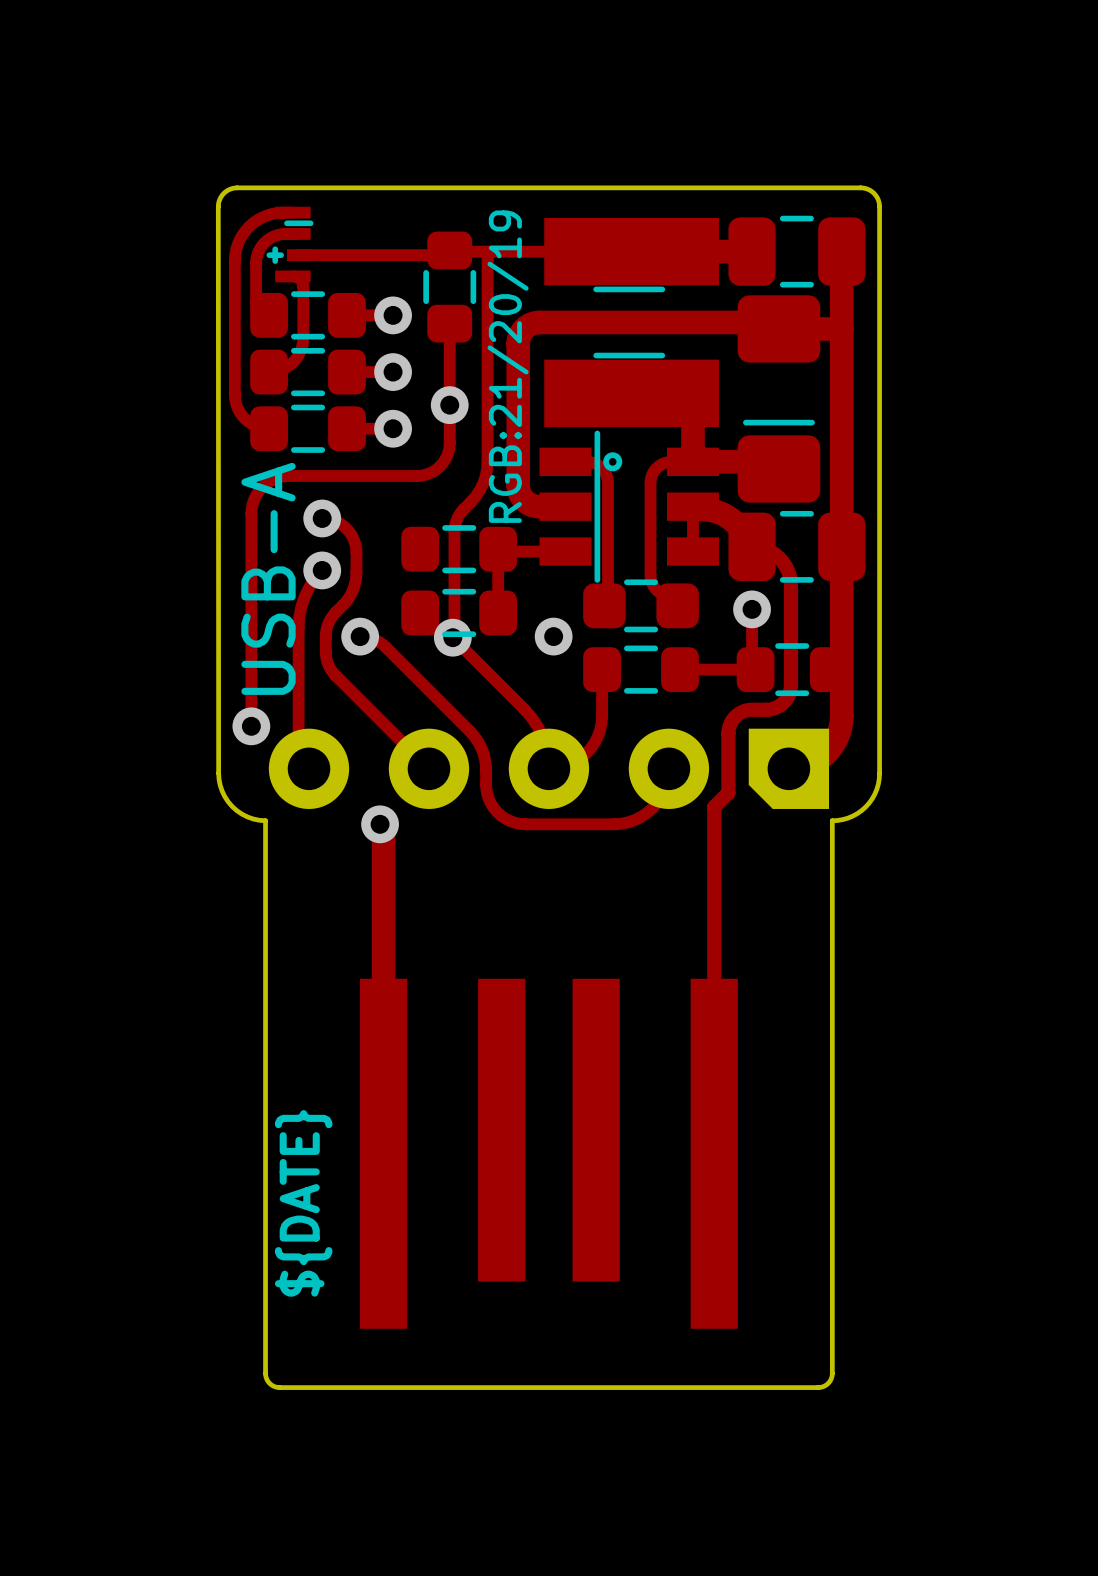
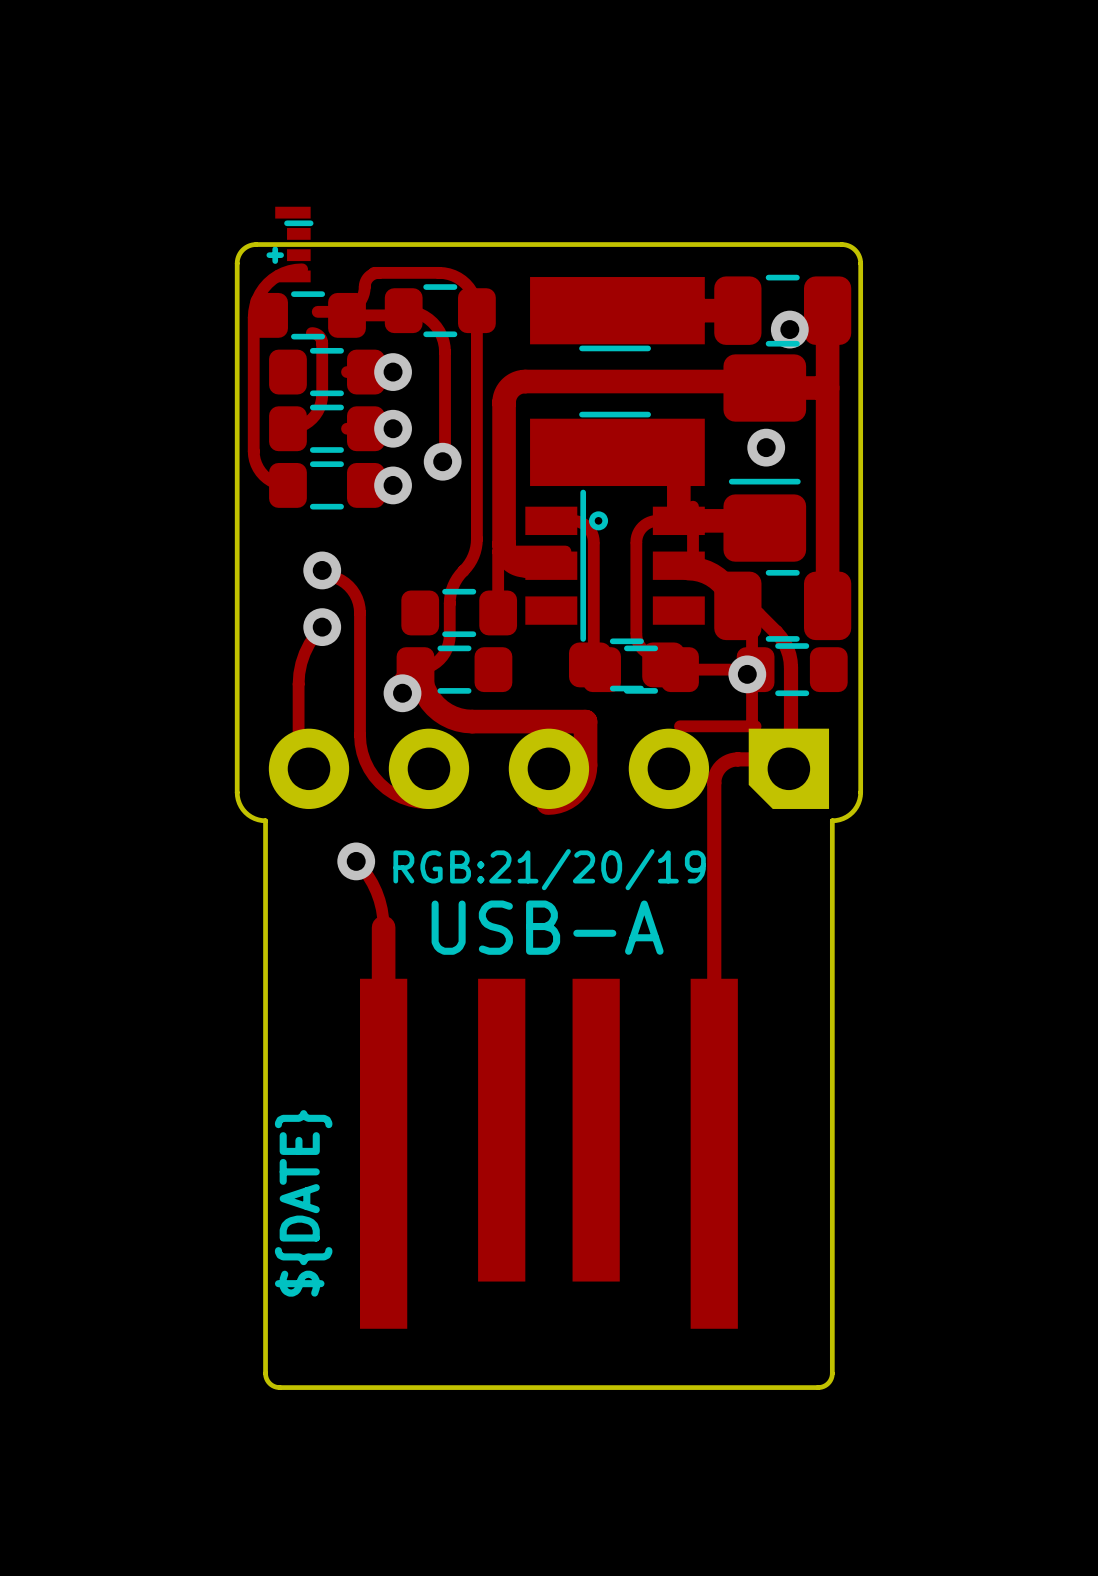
track: (292, 212) (270, 214) (253, 222) (241, 236) (235, 254) (235, 398) (239, 411) (248, 421) (260, 427) (269, 428) -> none
track: (298, 233) (282, 234) (272, 236) (262, 245) (257, 253) (256, 304) (259, 311) (269, 315) -> none
track: (487, 251) (487, 469) (479, 490) (459, 513) (455, 525) (454, 636) (452, 637) -> none
track: (631, 251) (449, 250) (438, 255) (298, 255) -> none
drawing position: (796, 251) -> (782, 310)
track: none -> (302, 269) (283, 273) (272, 279) (260, 293) (254, 311) (254, 455) (256, 464) (263, 475) (274, 482) (287, 485)
track: none -> (374, 272) (448, 274) (465, 283) (474, 296) (476, 305) (476, 547) (471, 559) (457, 578) (451, 590) (449, 639) (445, 652) (432, 665) (415, 669)
track: none -> (378, 272) (367, 278) (361, 299) (352, 308) (343, 311) (317, 311)
track: (292, 276) (299, 278) (303, 285) (302, 346) (298, 354) (289, 364) (282, 369) (269, 372) -> (311, 333) (318, 335) (322, 342) (321, 403) (317, 411) (308, 421) (296, 427) (287, 428)
part rotation: 0° (449, 287) -> 90° clockwise (440, 310)
track: none -> (403, 310) (419, 313) (428, 319) (436, 326) (443, 341) (445, 459) (442, 461)
via: (393, 315) -> none
drawing position: (629, 322) -> (615, 381)
track: (449, 323) (449, 446) (446, 457) (440, 466) (431, 472) (420, 475) (284, 476) (266, 483) (254, 499) (251, 513) (251, 726) -> none
via: none -> (789, 329)
text rotation: 0° (508, 366) -> 90° clockwise (549, 869)
text position: RGB:21/20/19 (508, 366) -> RGB:21/20/19 (549, 869)
part position: (308, 372) -> (326, 372)
via: (449, 405) -> none
part position: (685, 422) -> (671, 481)
drawing position: (778, 422) -> (764, 481)
part position: (308, 428) -> (326, 428)
via: none -> (766, 447)
via: none -> (442, 461)
part: none -> (326, 485)
via: none -> (393, 485)
track: (322, 518) (333, 520) (346, 528) (354, 541) (356, 552) (356, 577) (352, 590) (345, 601) (331, 617) (327, 626) (325, 651) (328, 664) (335, 675) (428, 768) -> none
via: (322, 518) -> none
track: (752, 546) (766, 549) (775, 554) (785, 566) (789, 575) (791, 667) -> (737, 605) (755, 611) (780, 637) (789, 654) (791, 667)
drawing position: (796, 546) -> (782, 605)
track: (841, 546) (840, 727) (833, 744) (821, 757) (806, 765) (788, 768) -> none
part: (459, 549) -> none
track: (322, 570) (309, 587) (301, 606) (298, 627) (298, 684) -> (322, 627) (304, 653) (298, 684)
track: none -> (322, 575) (336, 578) (345, 582) (352, 589) (358, 603) (360, 735) (365, 761) (379, 783) (393, 793) (410, 800) (427, 803)
text rotation: 0° (268, 578) -> 90° clockwise (547, 927)
text position: USB-A (268, 578) -> USB-A (547, 927)
drawing position: (641, 605) -> (626, 664)
via position: (752, 609) -> (747, 674)
via: none -> (322, 627)
track: (360, 636) (370, 638) (382, 644) (473, 735) (479, 744) (485, 759) (486, 789) (489, 799) (497, 812) (510, 821) (525, 824) (613, 824) (627, 822) (641, 816) (657, 802) (664, 790) (668, 768) -> none
via: (360, 636) -> none
via: (553, 636) -> none
track: (452, 637) (531, 717) (546, 746) (548, 768) (562, 767) (575, 761) (586, 753) (594, 742) (601, 722) (602, 669) -> none
via: (452, 637) -> none
track: none -> (752, 666) (752, 722)
part: none -> (454, 669)
track: (791, 684) (787, 697) (778, 706) (769, 709) (745, 710) (737, 714) (731, 721) (728, 733) (728, 792) (714, 806) -> (791, 684) (790, 731) (786, 743) (778, 752) (767, 758) (734, 759) (723, 764) (715, 776) (714, 806)
via: none -> (402, 693)
track: none -> (393, 696) (395, 686) (401, 677) (409, 671) (420, 669) (421, 683) (430, 701) (440, 710) (458, 719) (472, 721) (585, 721) (585, 765) (582, 779) (570, 795) (562, 800) (547, 803)
via: (251, 726) -> none
track: none -> (680, 726) (755, 726)
board edge: (265, 820) (247, 816) (232, 806) (222, 791) (218, 773) (218, 206) (223, 193) (237, 187) (860, 187) (874, 193) (879, 206) (879, 778) (874, 794) (865, 806) (852, 816) (832, 820) -> (265, 820) (254, 818) (245, 812) (239, 803) (237, 792) (237, 263) (242, 250) (256, 244) (841, 244) (855, 250) (860, 263) (860, 792) (858, 803) (852, 812) (843, 818) (832, 820)
track: (380, 824) (383, 827) (383, 927) -> (356, 861) (367, 875) (376, 891) (381, 909) (383, 927)
via position: (380, 824) -> (356, 861)

